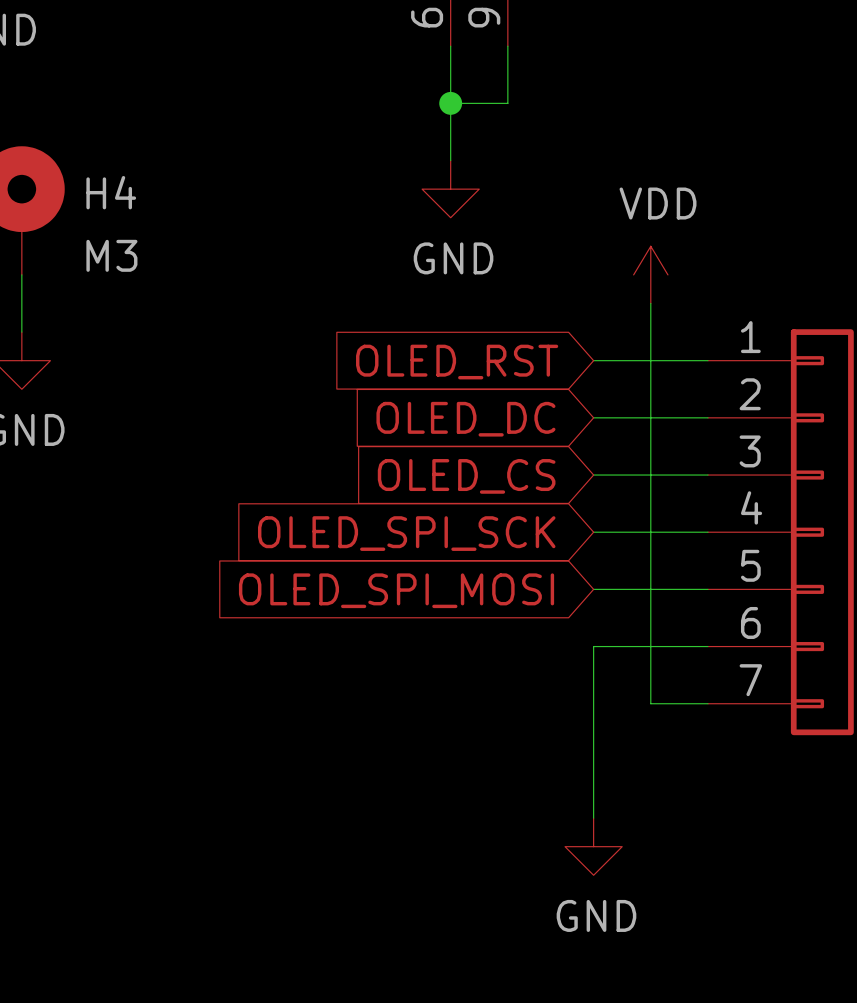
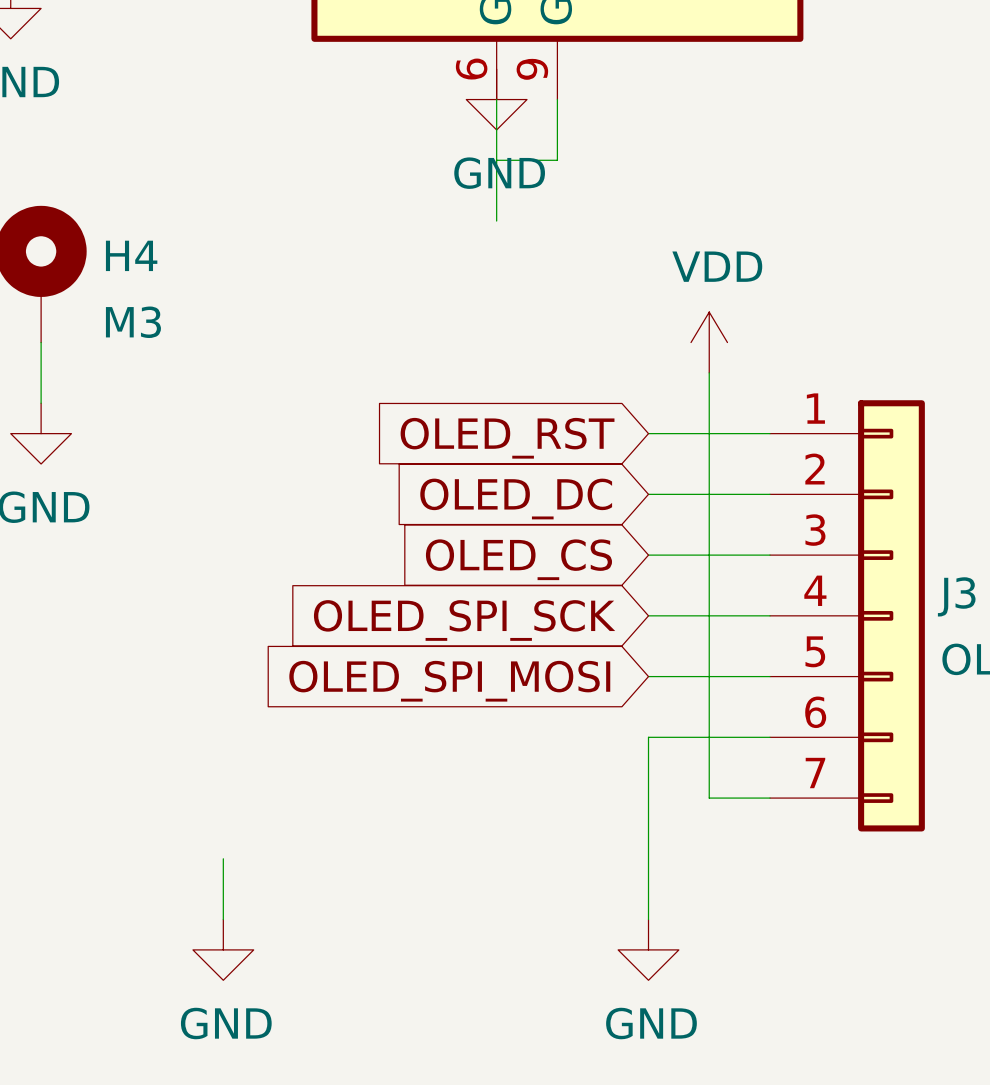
junction: (450, 103) -> none
power symbol position: GND (450, 189) -> GND (496, 99)
wire: none -> (223, 858) (223, 919)
power symbol: none -> GND (223, 949)

